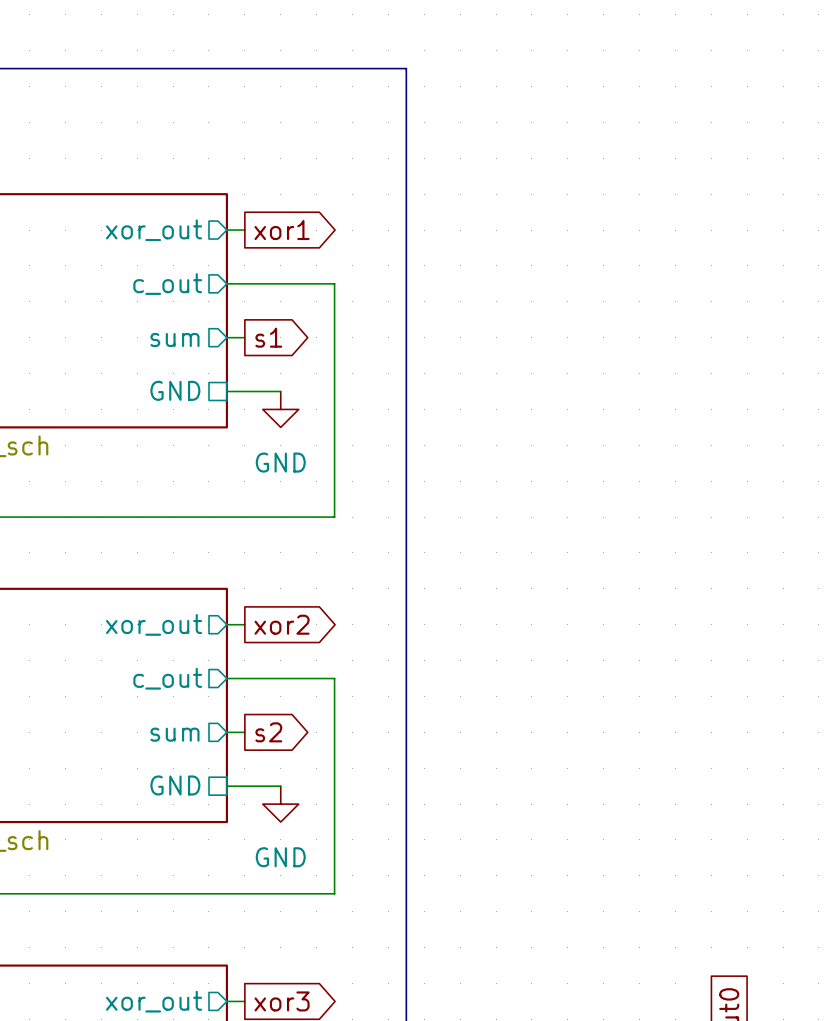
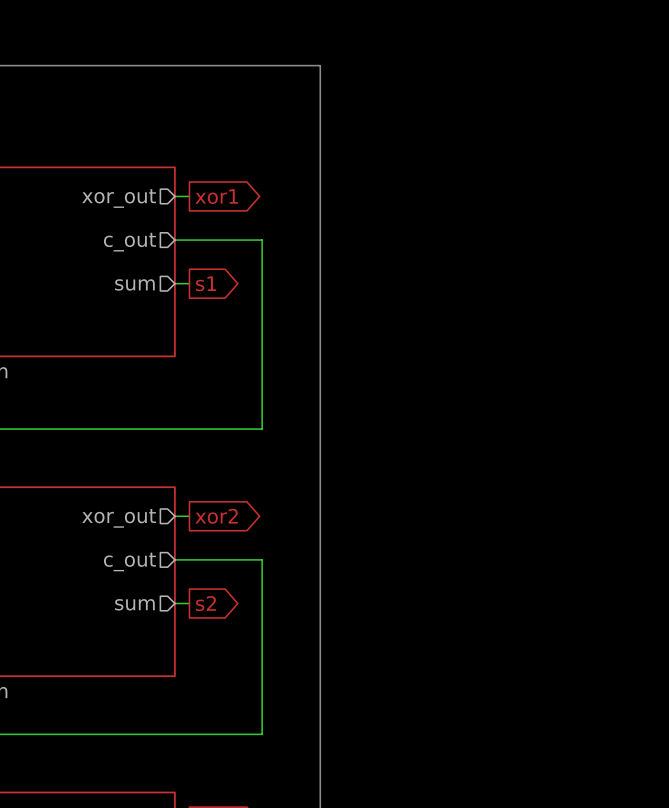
sheet pin: GND (175, 390) -> none
wire: (226, 391) (280, 391) -> none
power symbol: GND (280, 409) -> none
sheet pin: GND (175, 785) -> none
wire: (226, 786) (280, 786) -> none
power symbol: GND (280, 804) -> none

